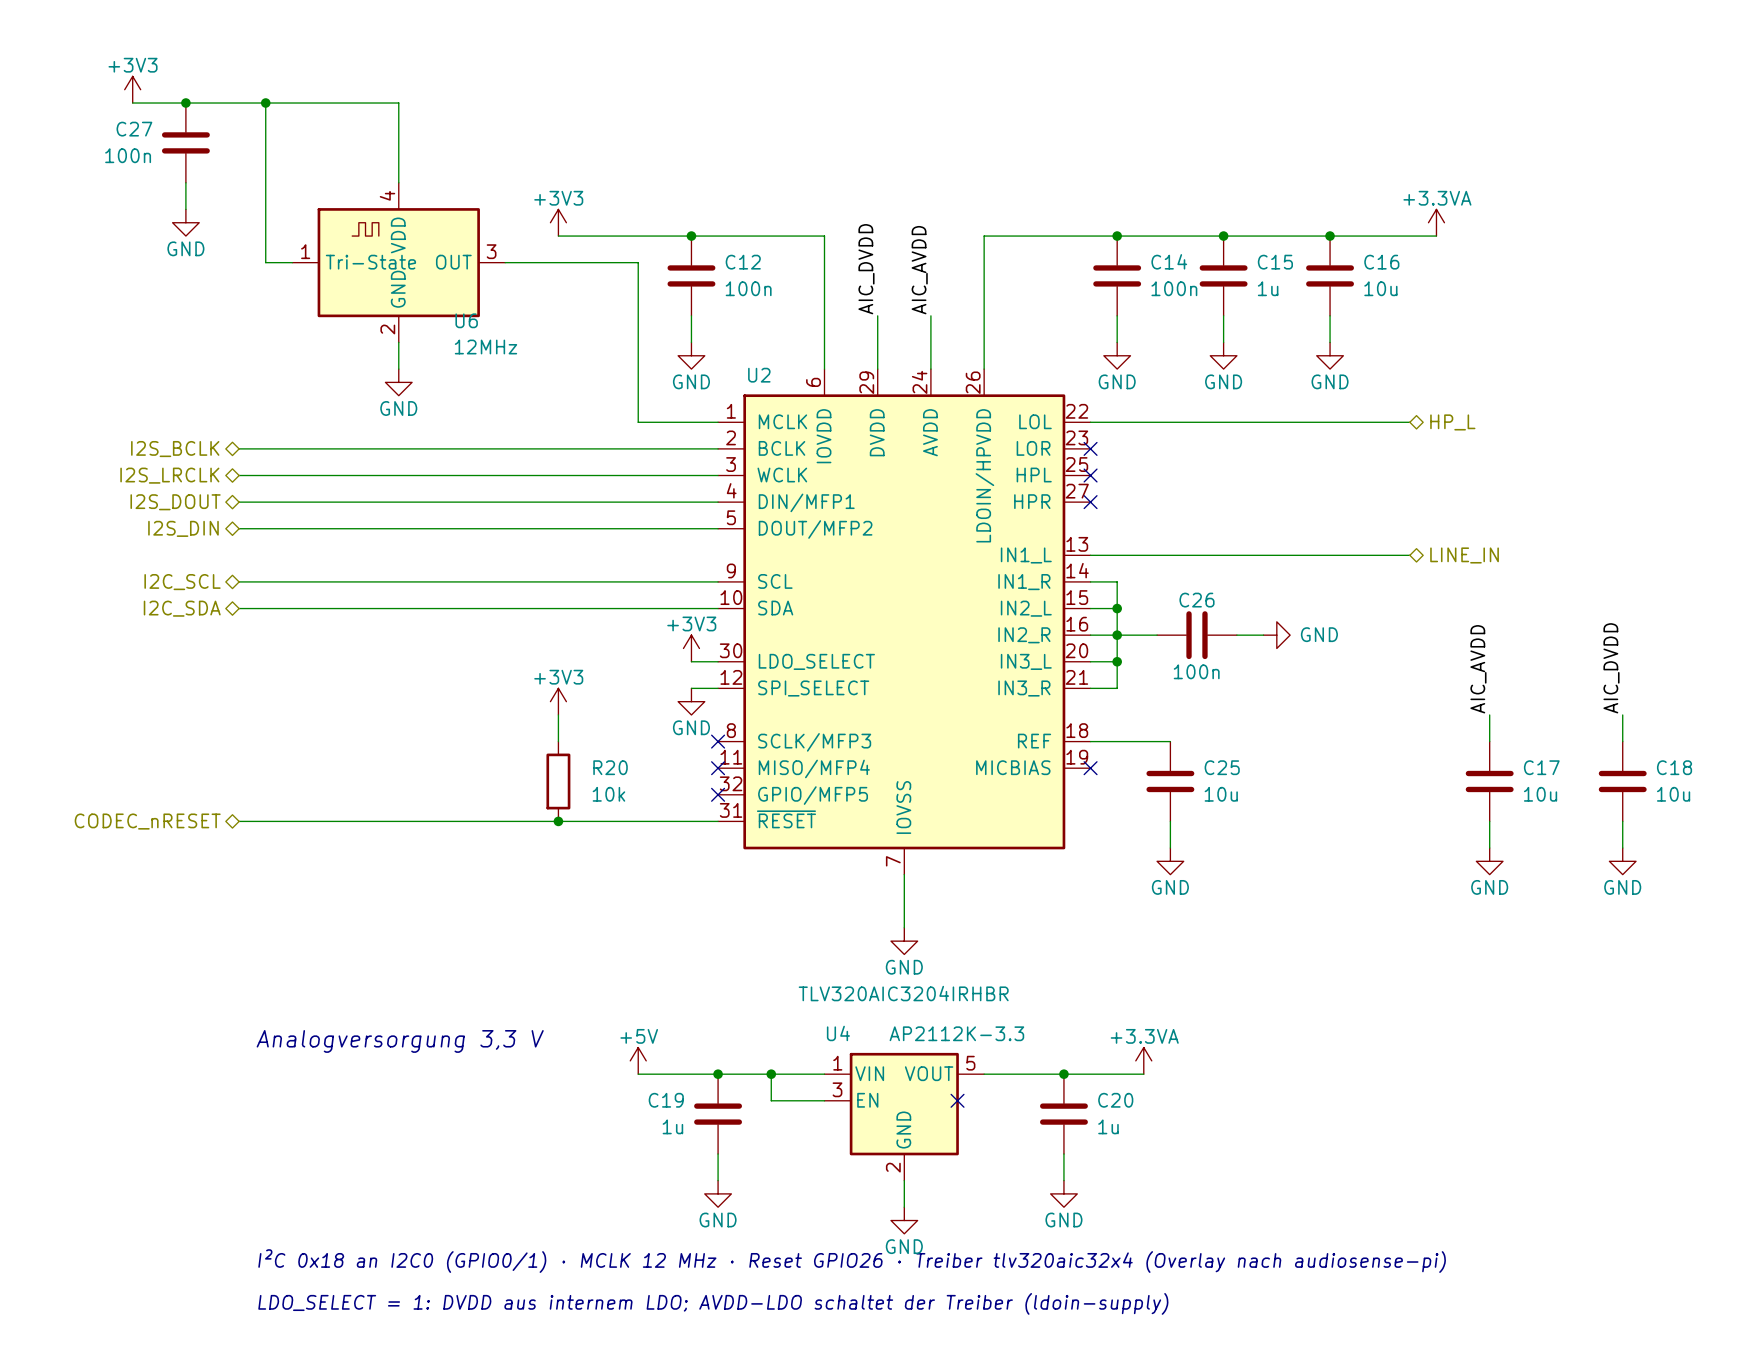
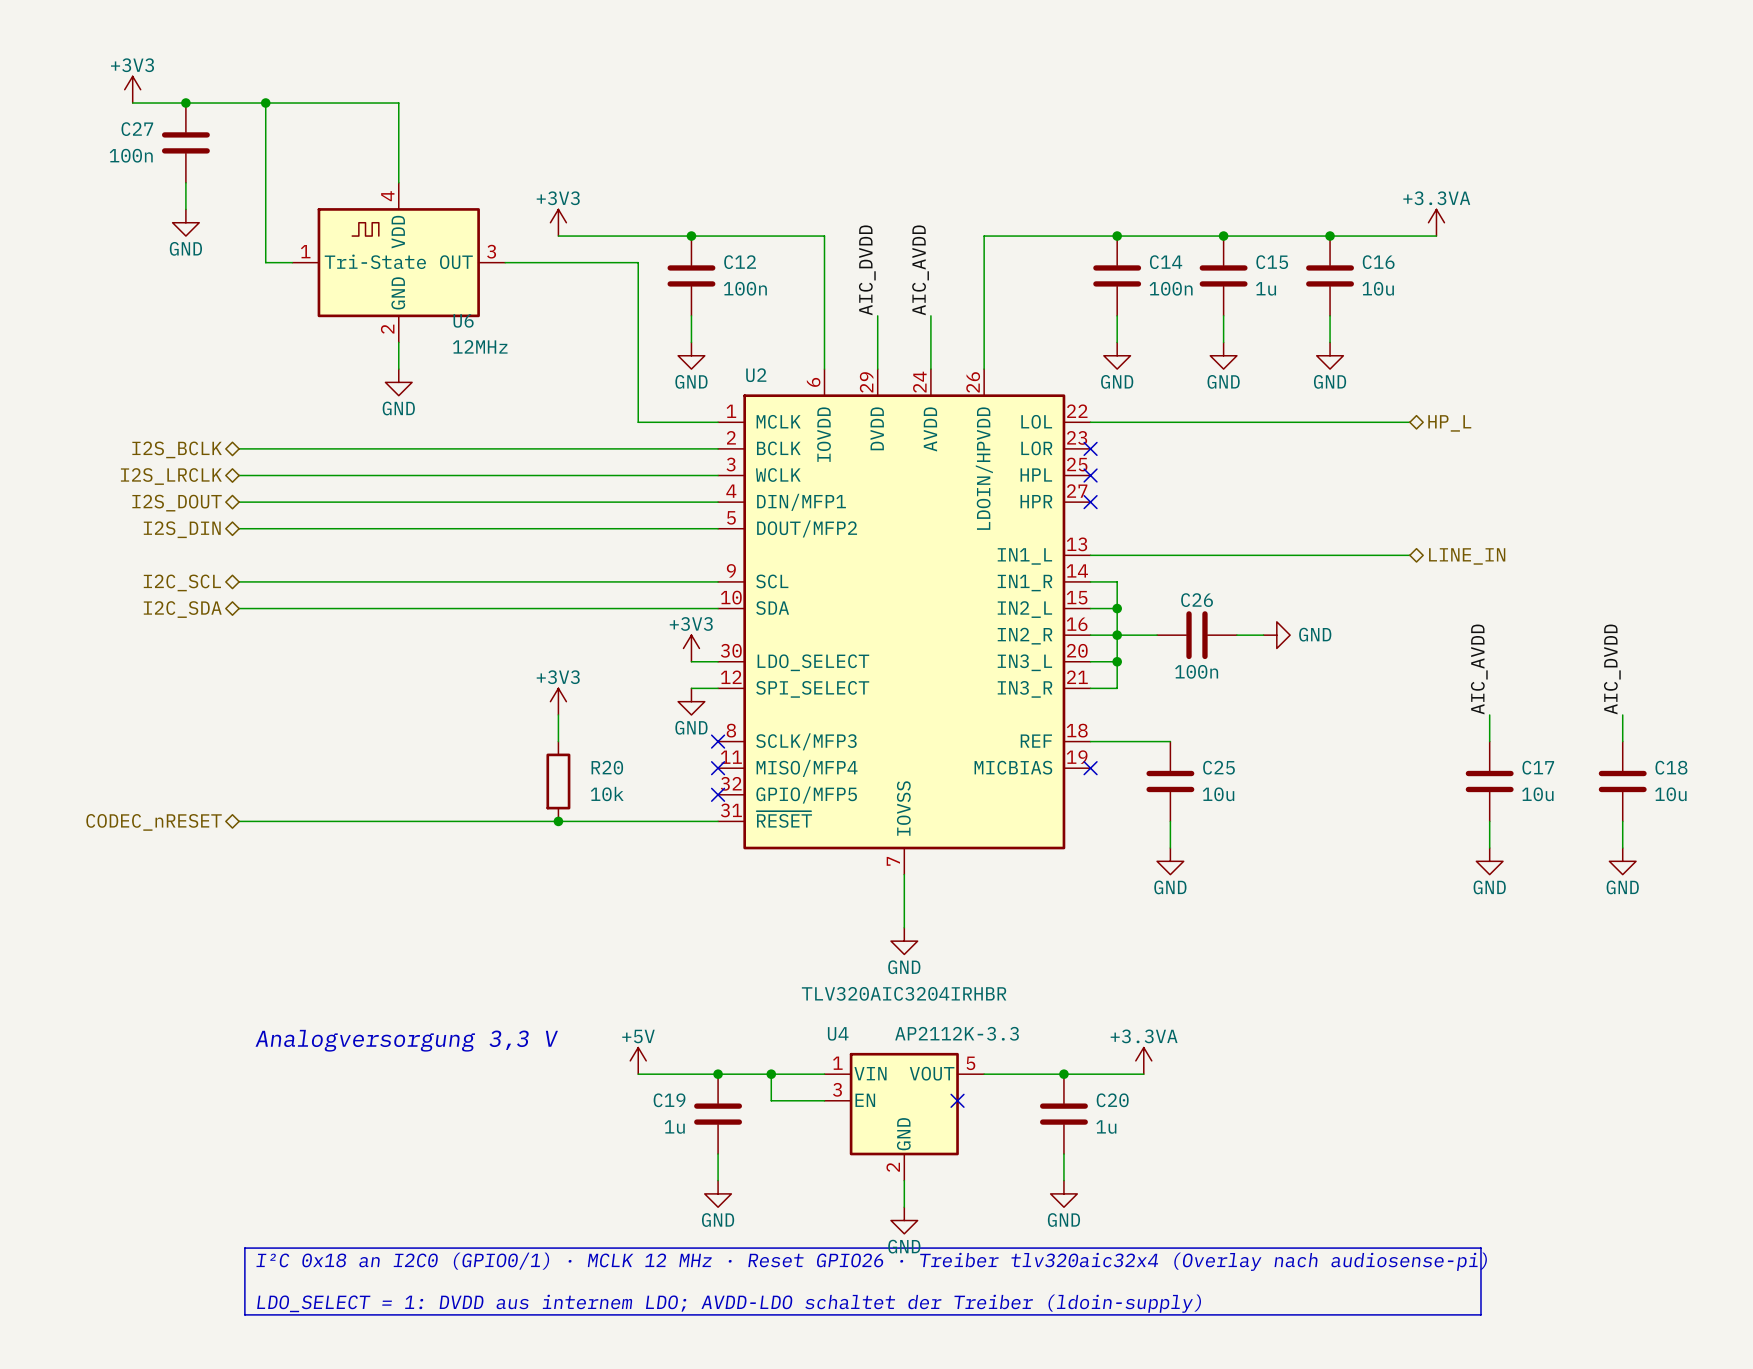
line: none -> (244, 1248) (1480, 1248) (1480, 1314) (244, 1314) (244, 1248)

